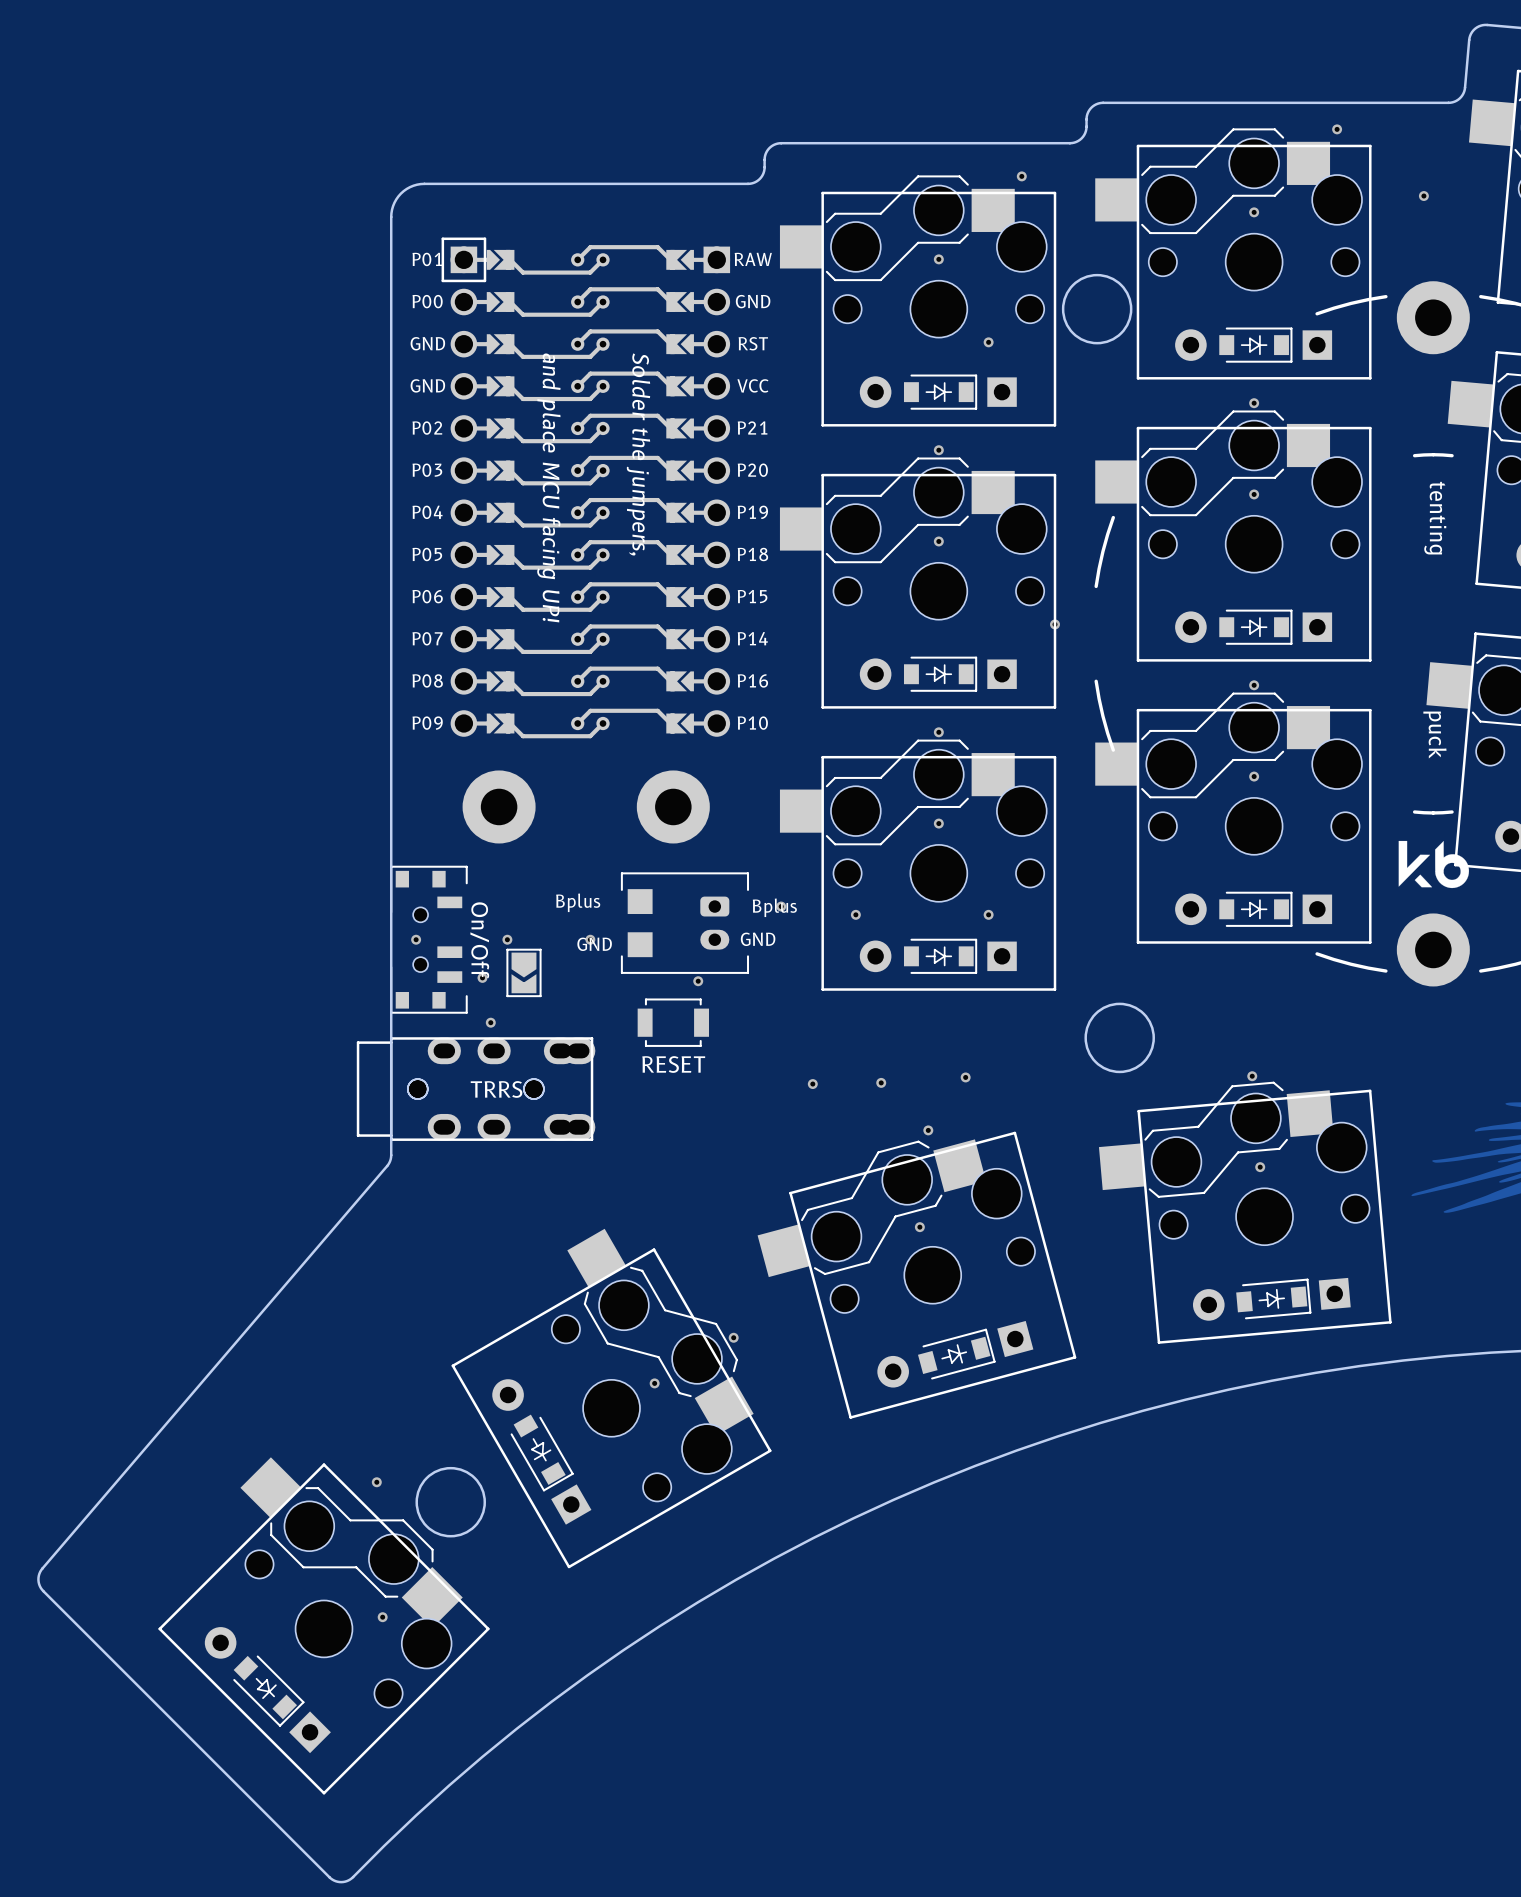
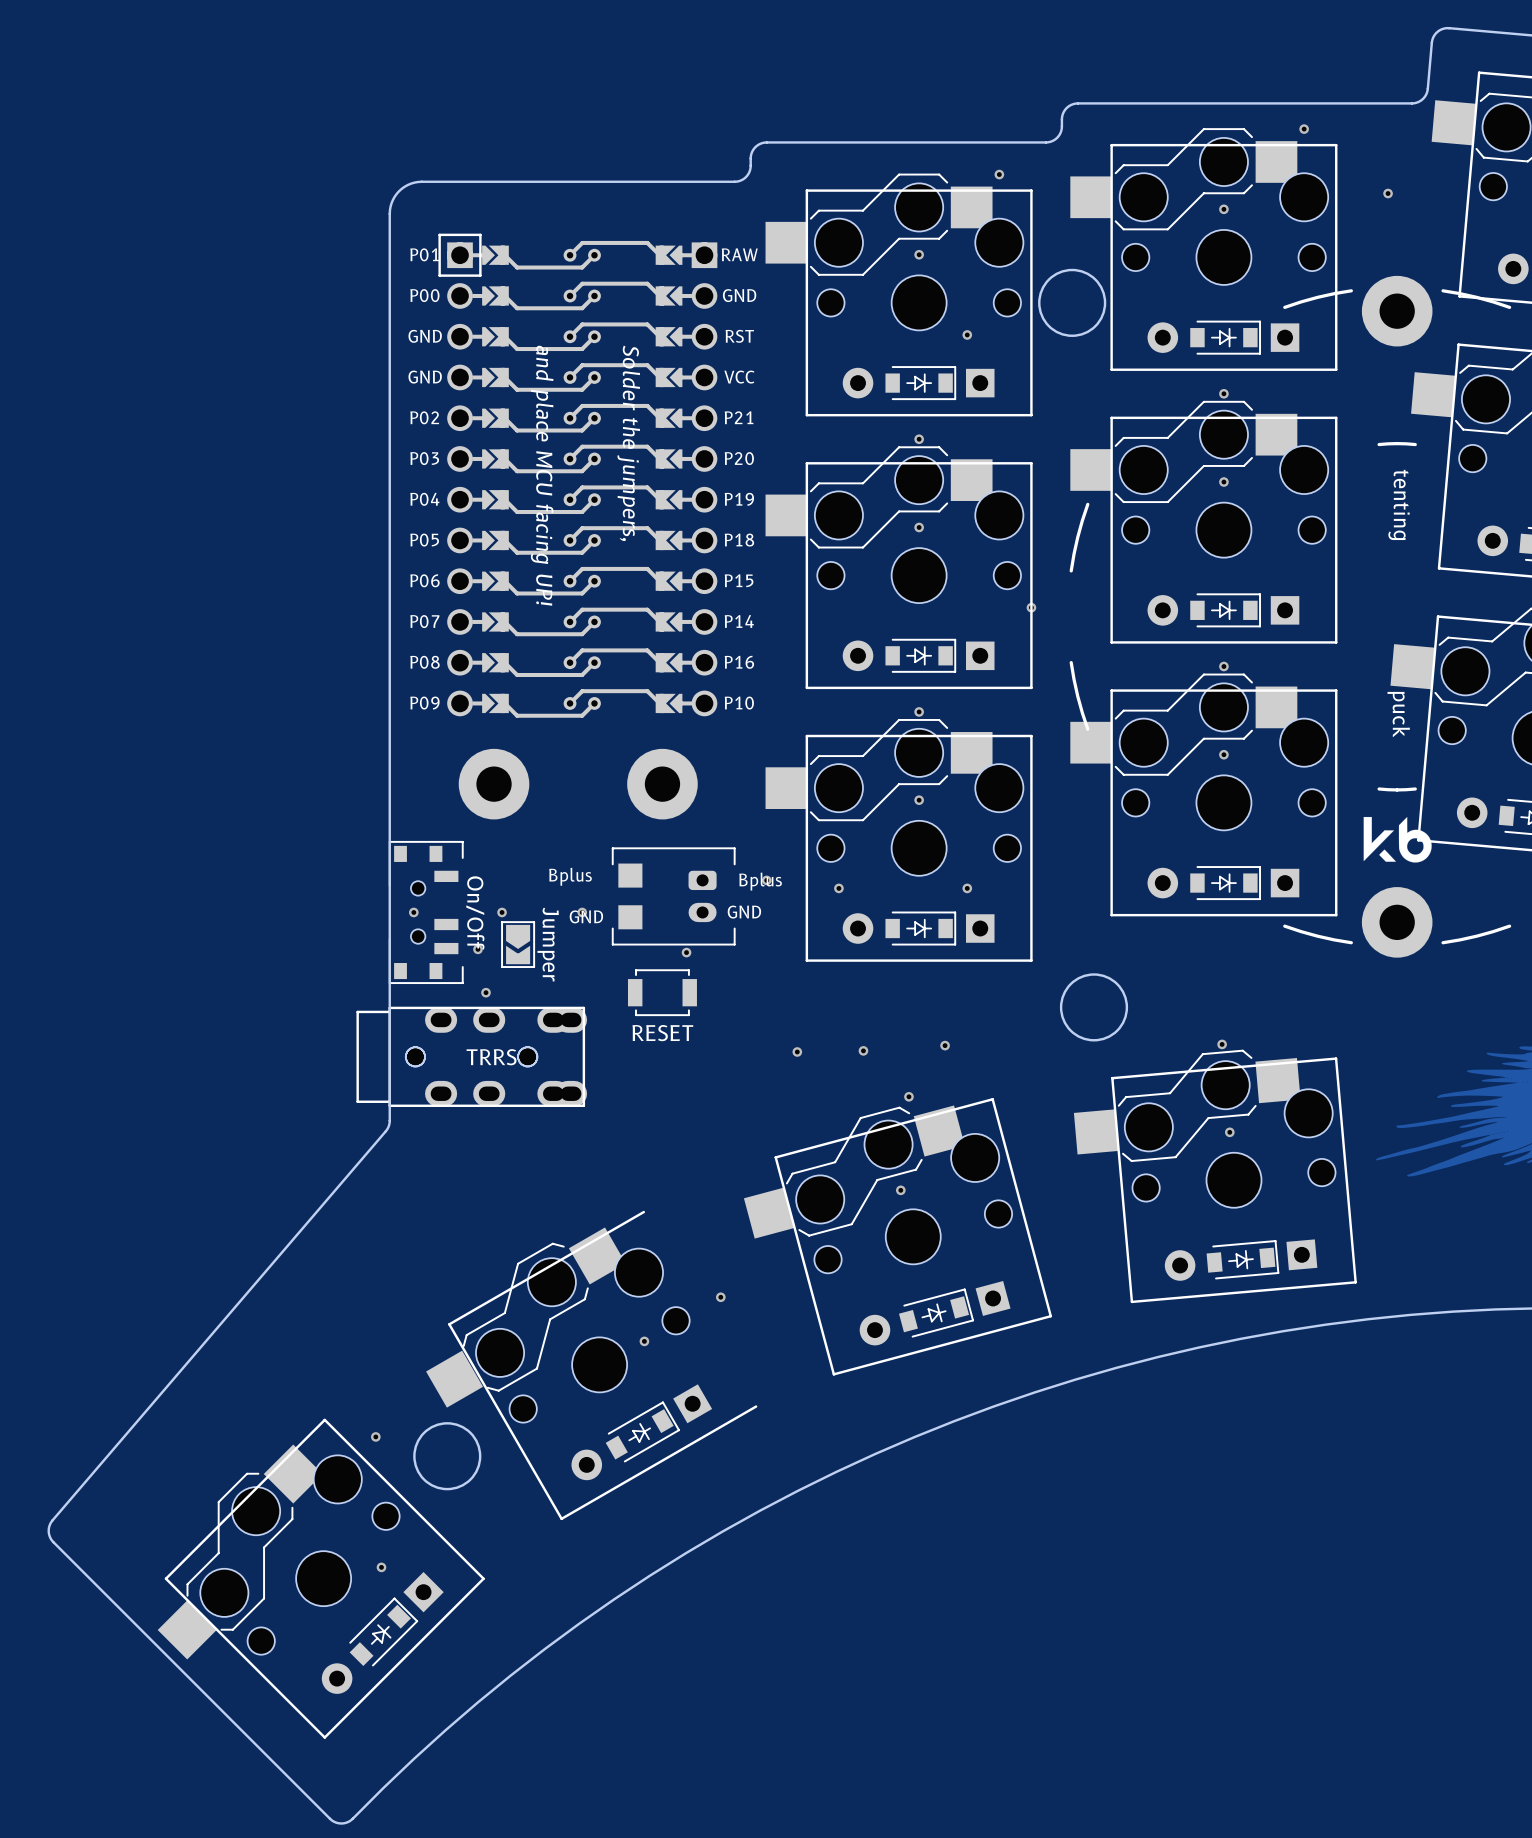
part value: none -> Jumper (548, 944)
line: (654, 1249) (770, 1450) -> none
part rotation: 0° (652, 1365) -> 90° counterclockwise (557, 1325)
part: (541, 1451) -> none
part: none -> (641, 1432)
part rotation: 0° (351, 1582) -> 90° counterclockwise (278, 1552)
part rotation: 0° (267, 1690) -> 90° counterclockwise (382, 1632)
part position: (267, 1690) -> (382, 1632)

